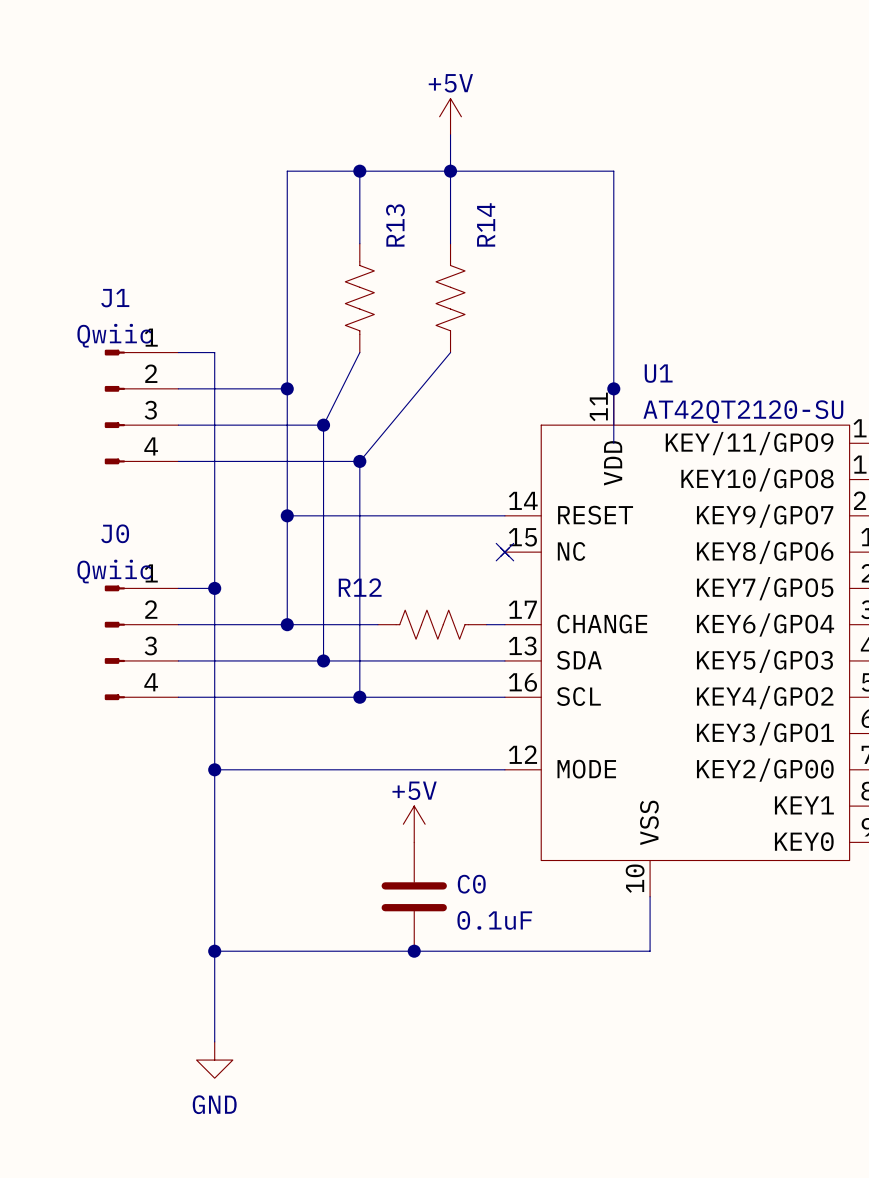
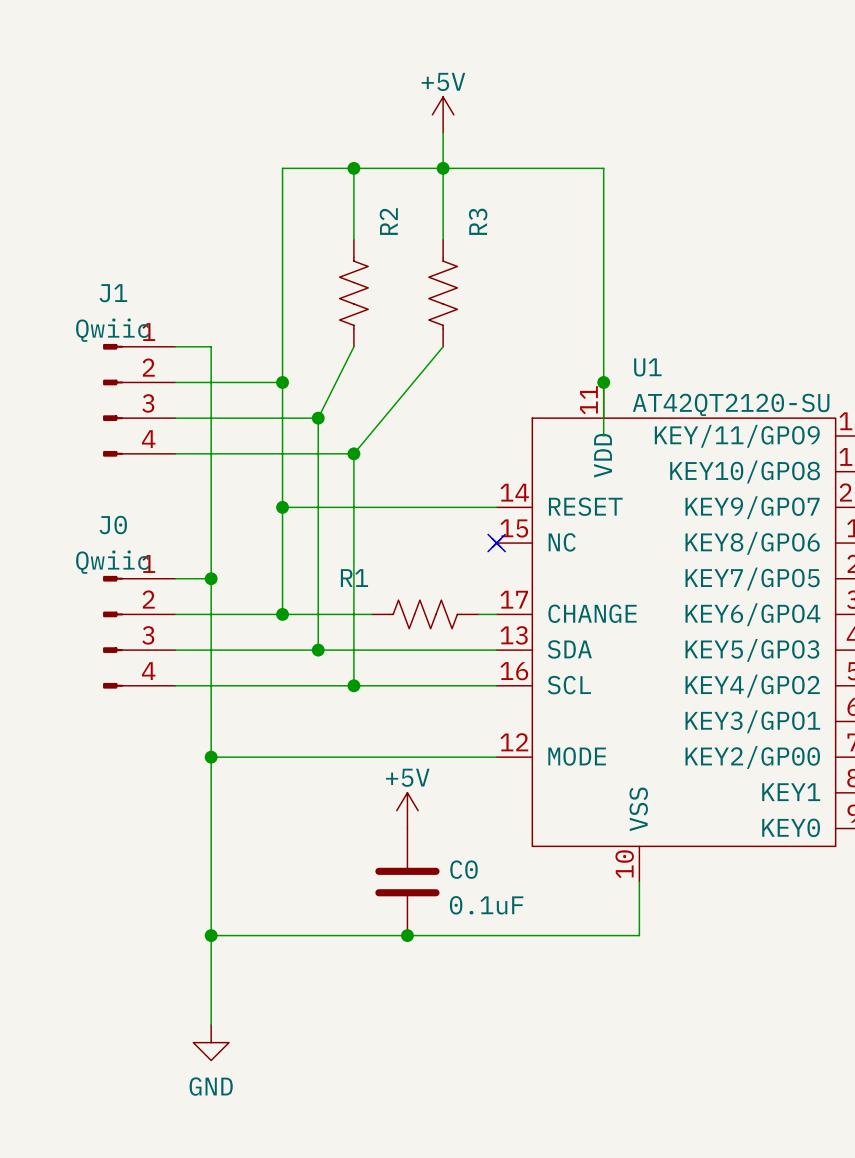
R14 name: R14 (486, 224) -> R3 (478, 221)
R13 name: R13 (395, 225) -> R2 (388, 221)
R12 name: R12 (360, 587) -> R1 (354, 578)

